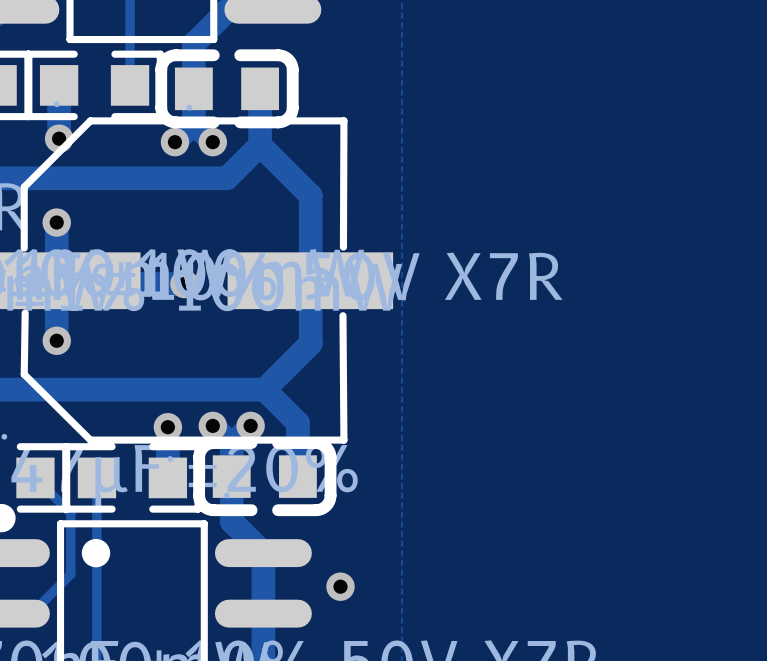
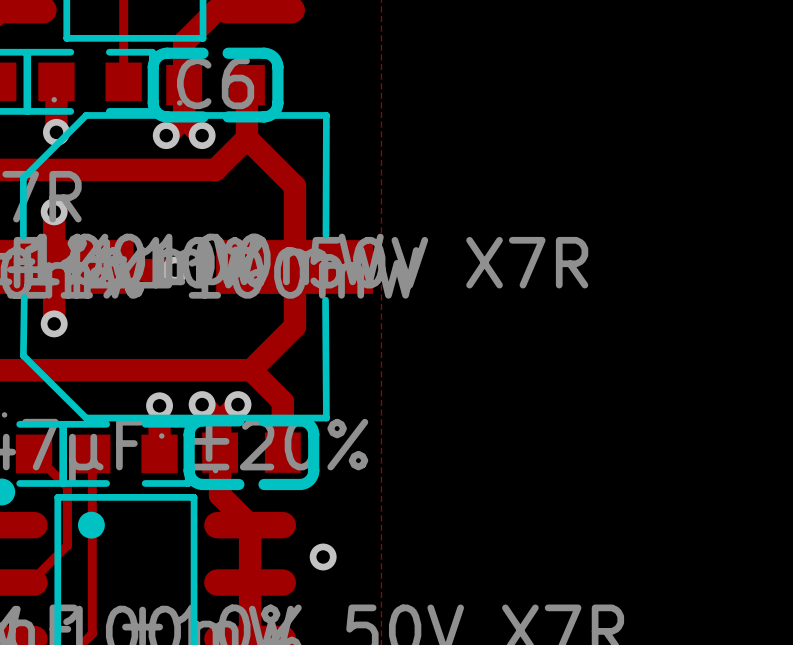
C6 name: none -> C6 (215, 83)

